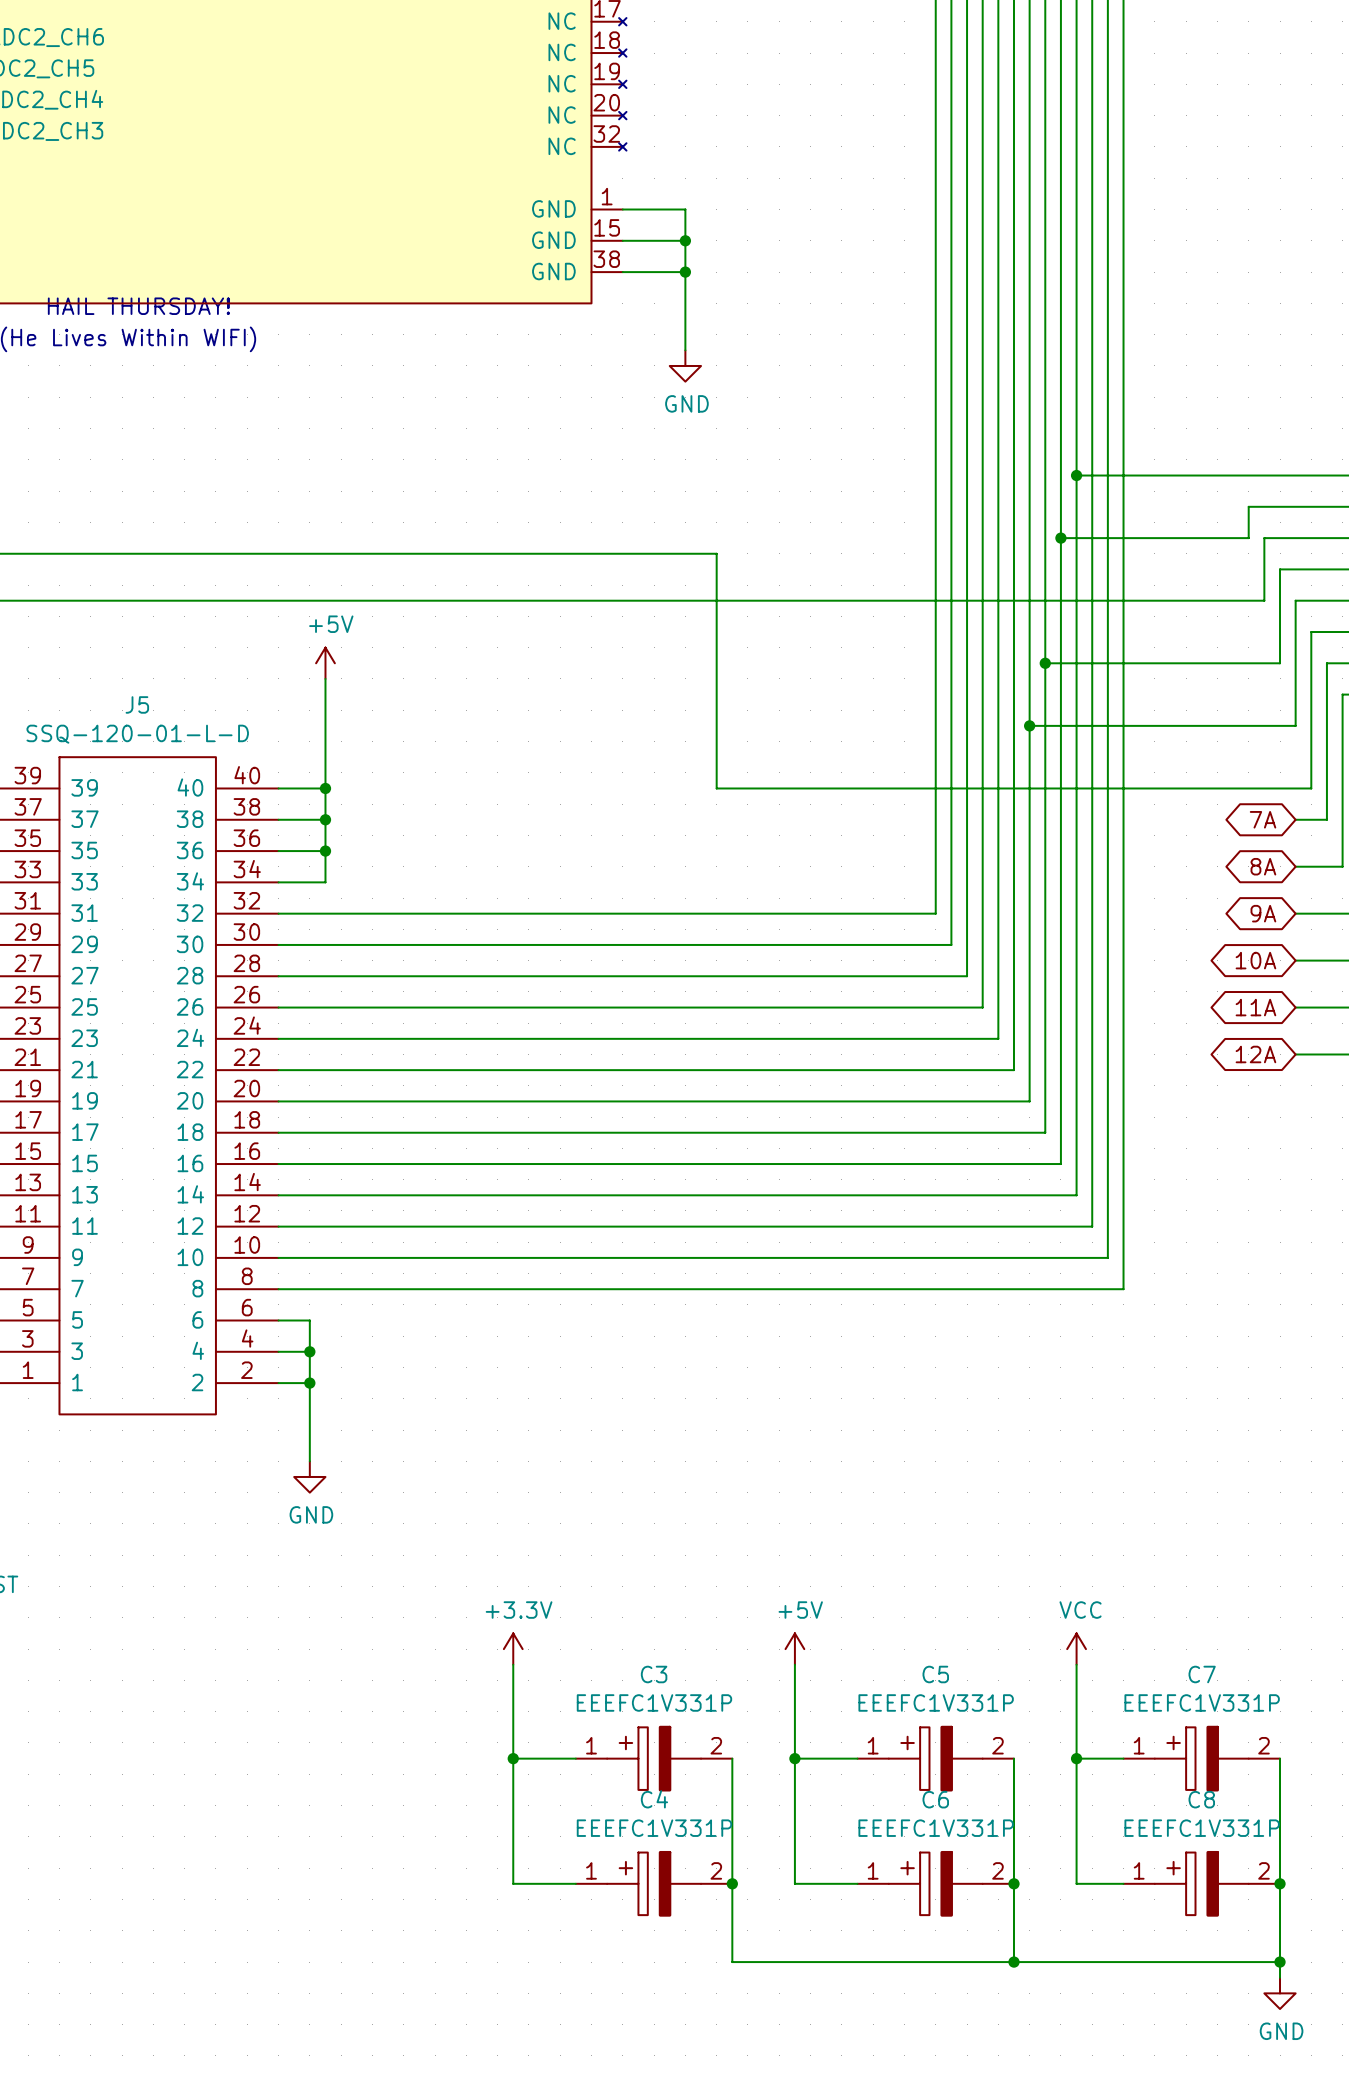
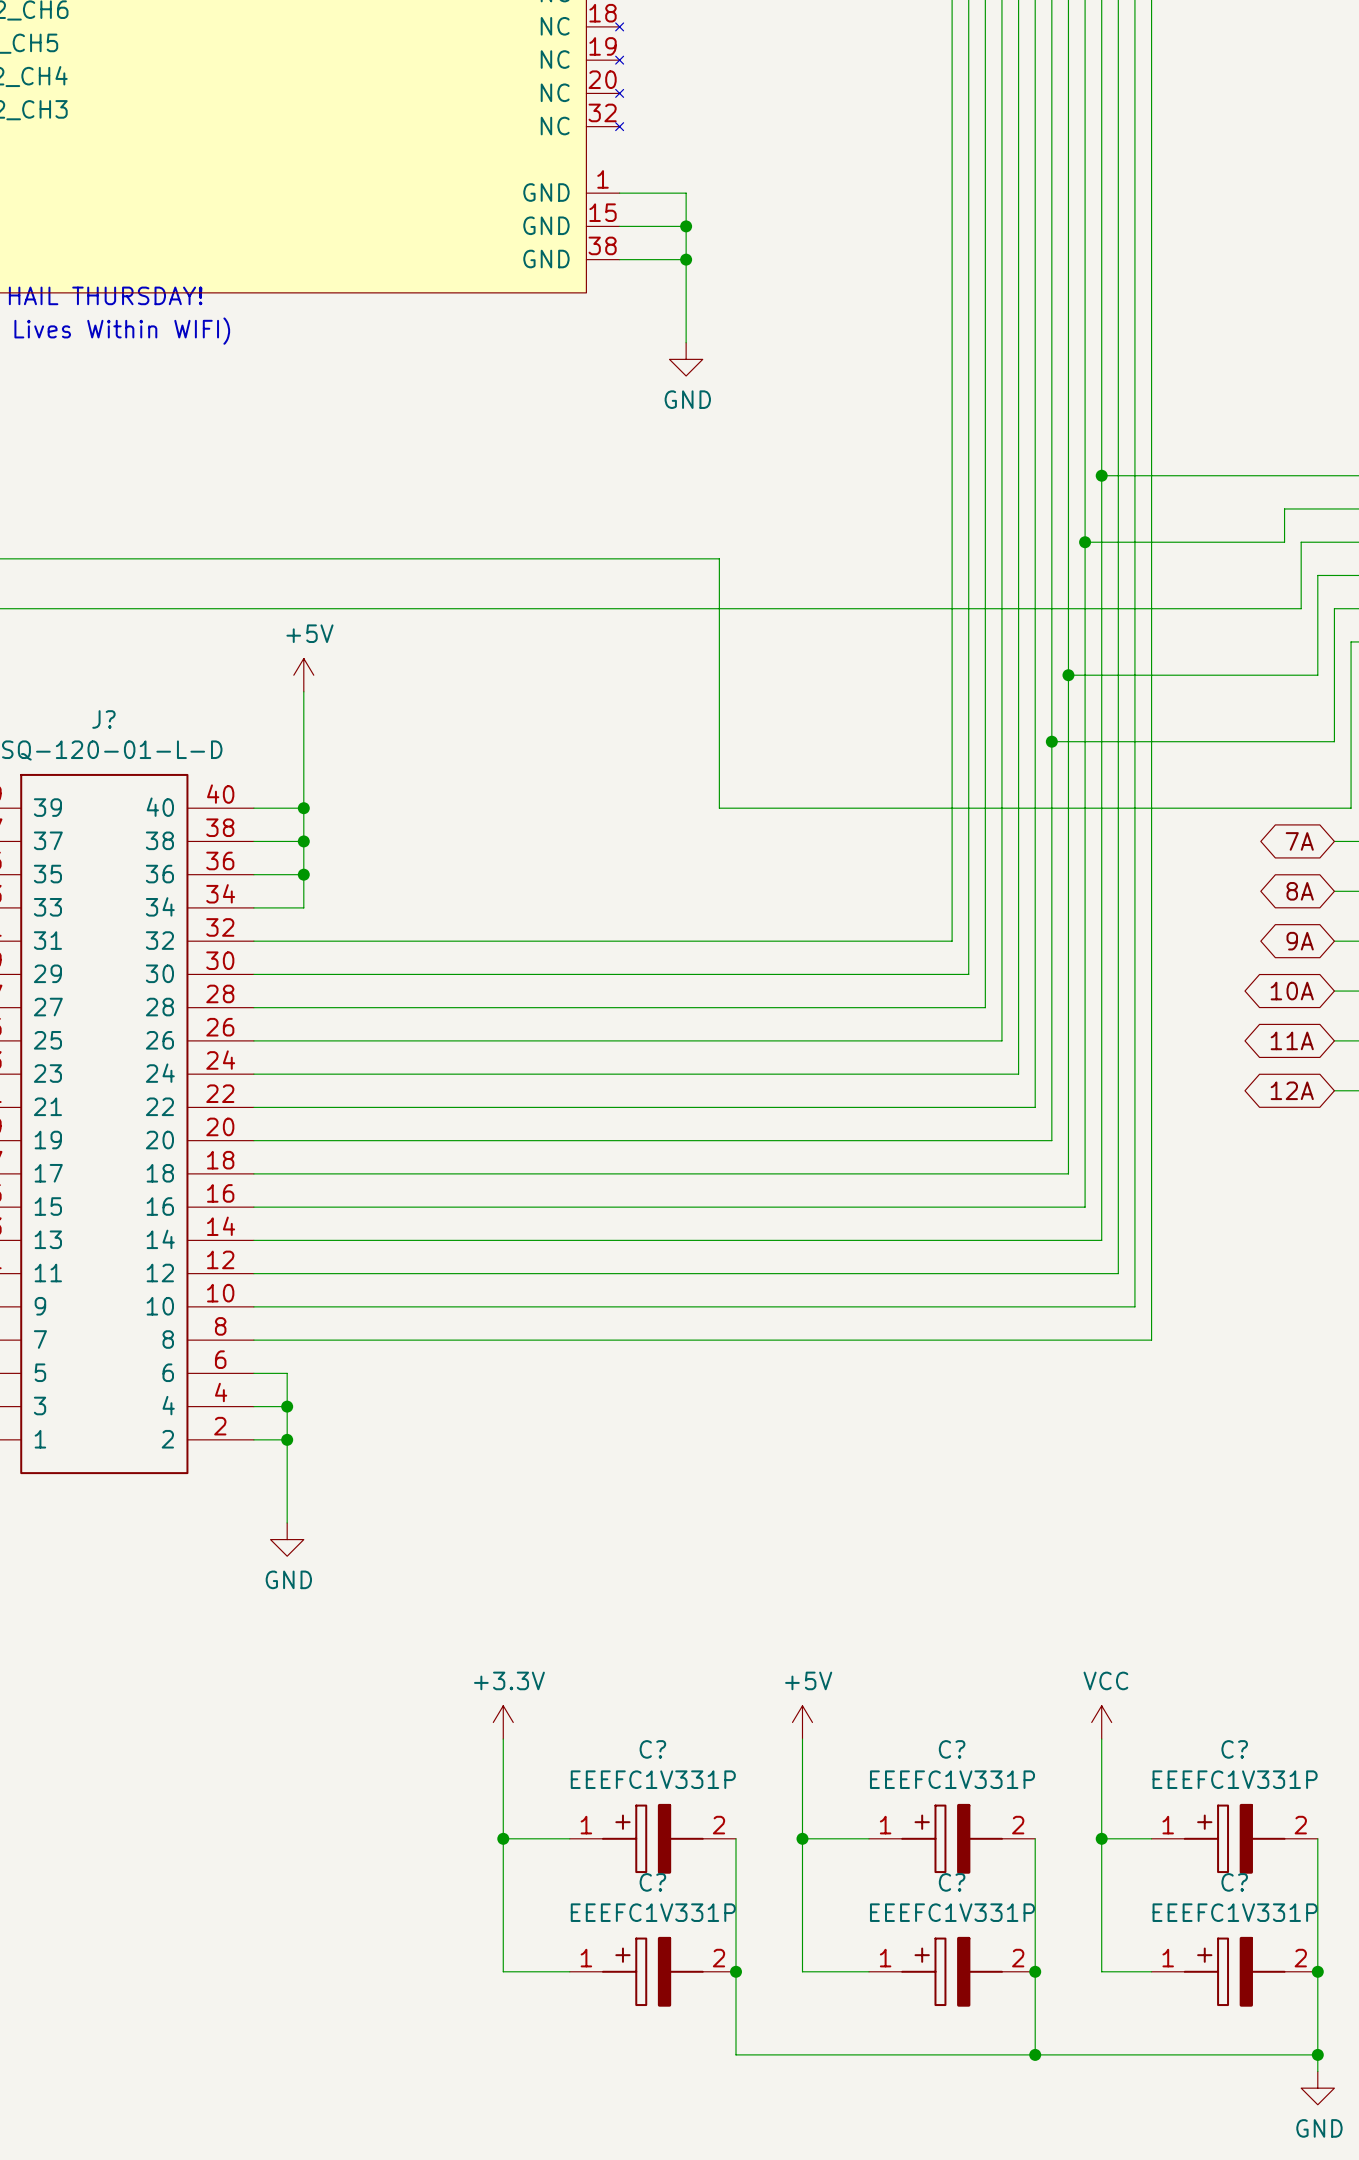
J5 name: J5 (137, 704) -> J? (103, 719)
C3 name: C3 (654, 1674) -> C? (652, 1749)
C5 name: C5 (935, 1674) -> C? (952, 1749)
C7 name: C7 (1202, 1674) -> C? (1234, 1749)
C4 name: C4 (654, 1799) -> C? (652, 1882)
C6 name: C6 (935, 1799) -> C? (952, 1882)
C8 name: C8 (1201, 1799) -> C? (1234, 1882)

